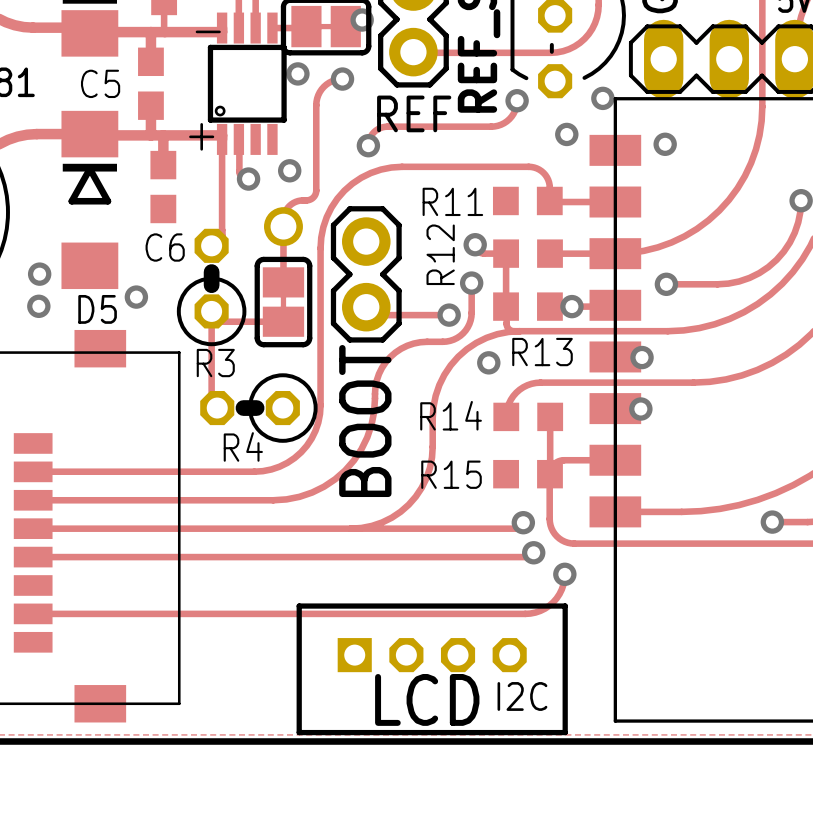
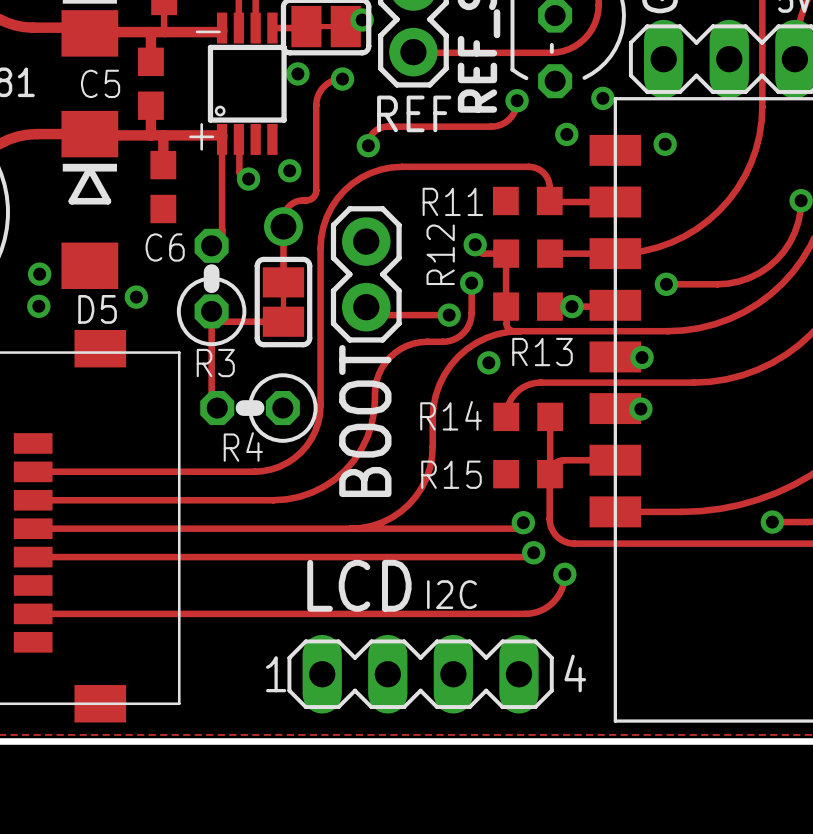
part footprint: [296, 603, 568, 736] -> [287, 634, 554, 714]
text position: I2C (522, 696) -> I2C (451, 594)
text position: LCD (427, 699) -> LCD (359, 585)

